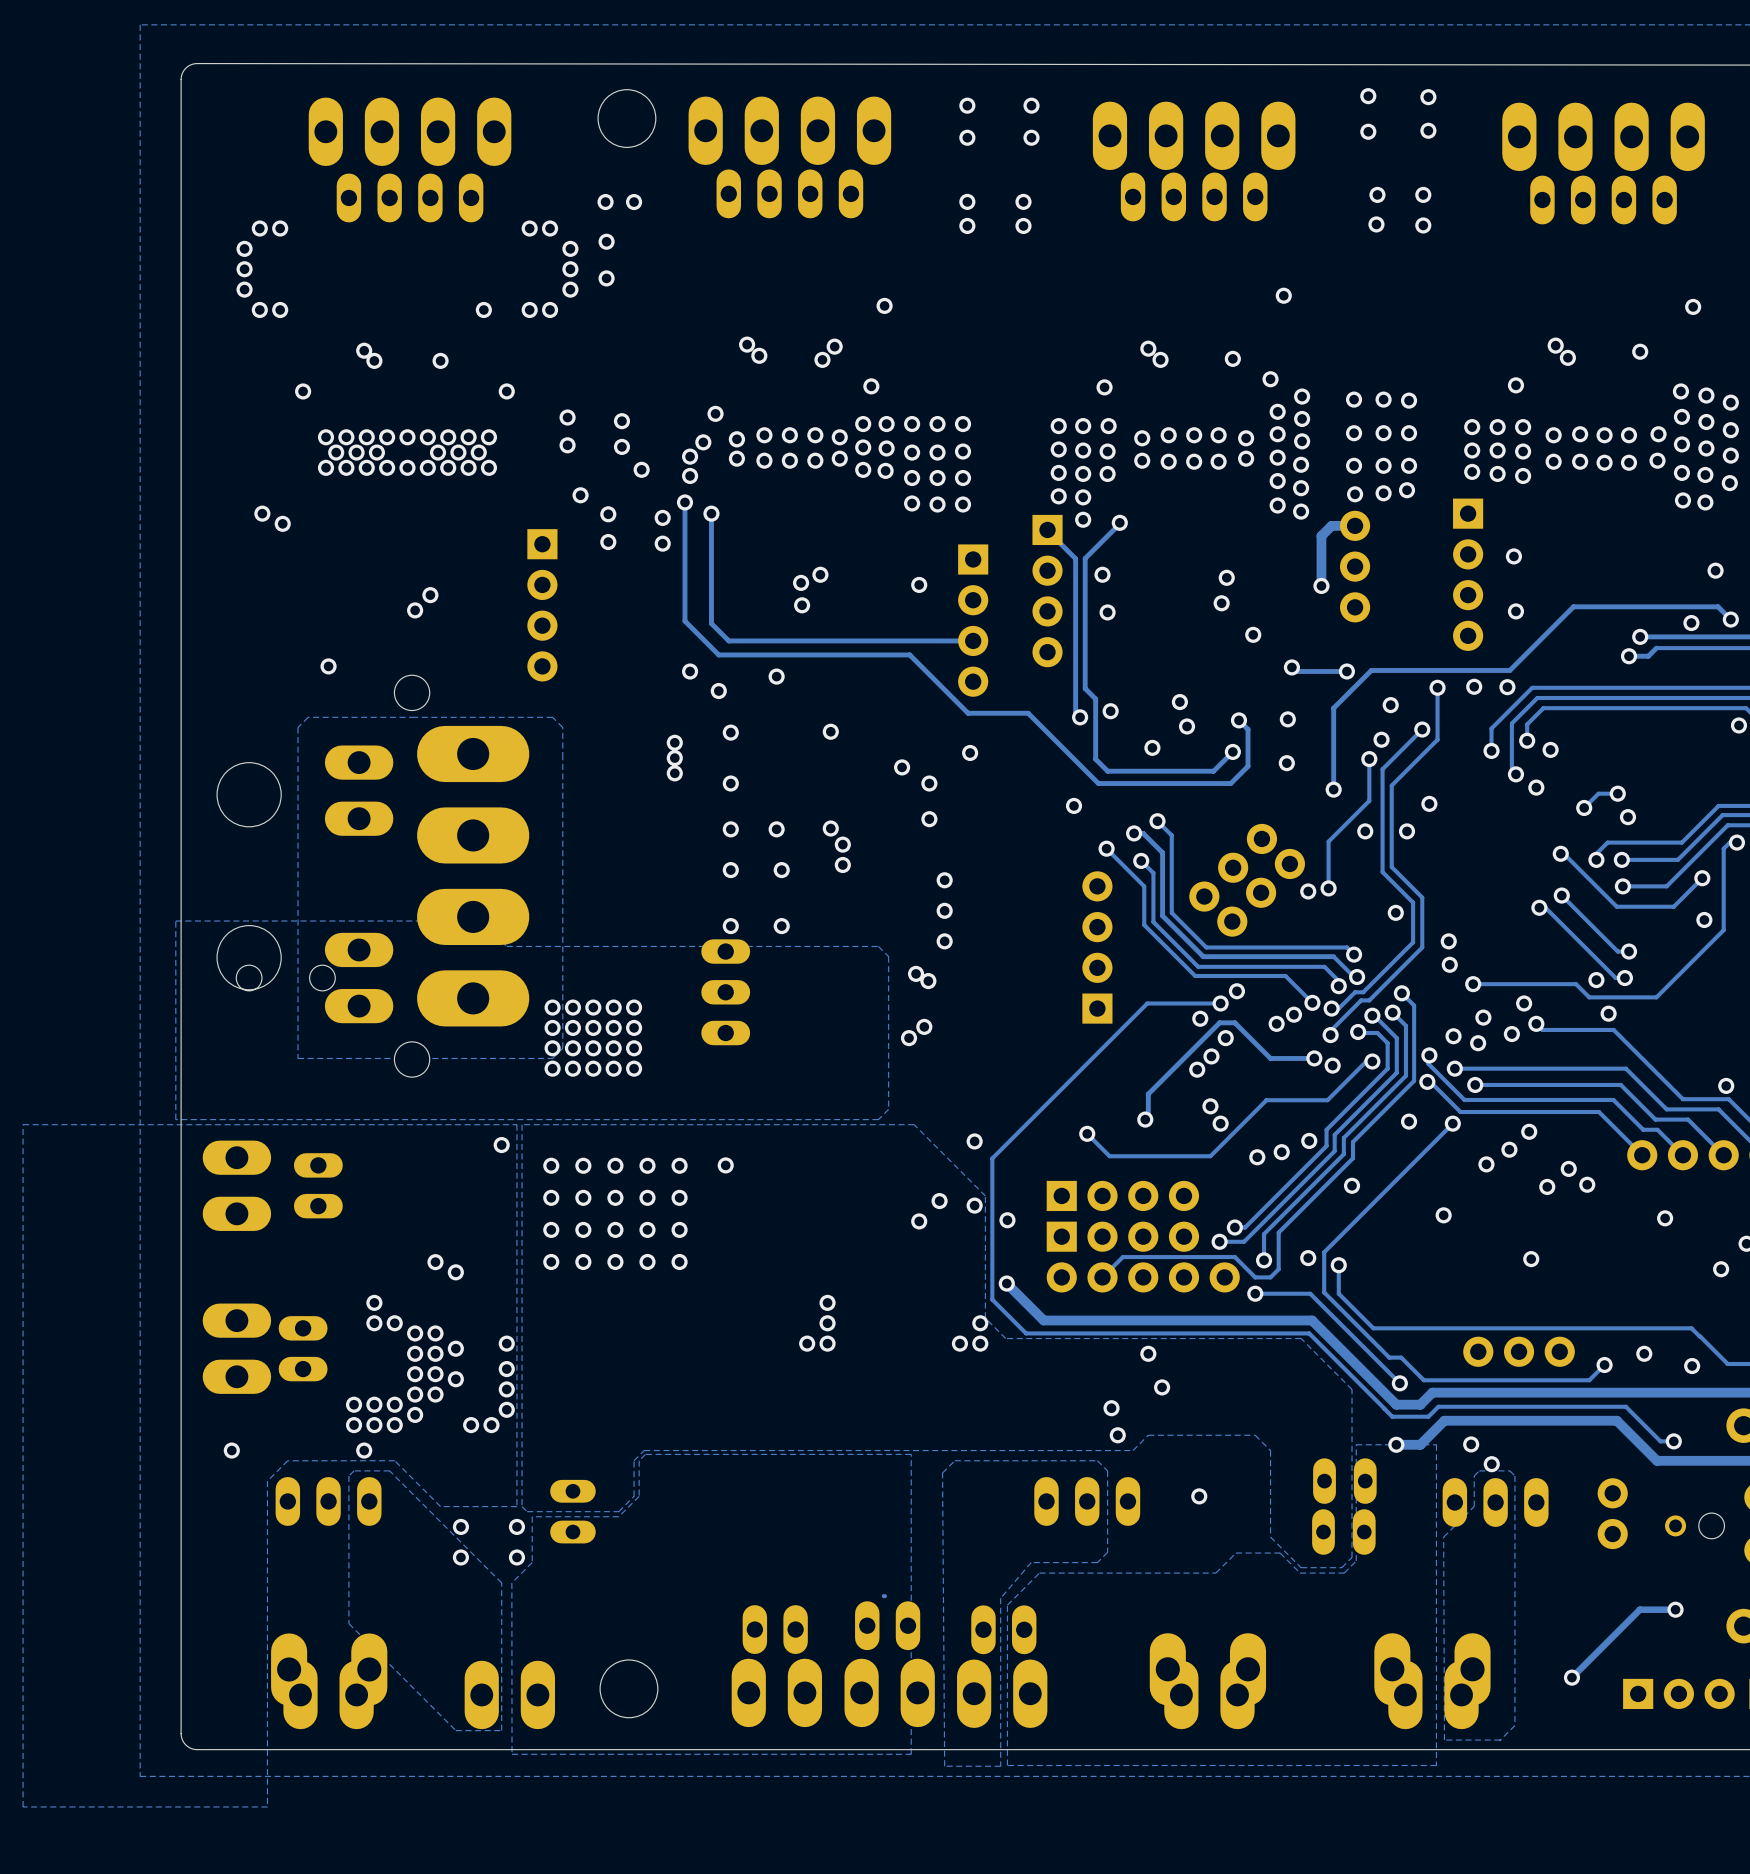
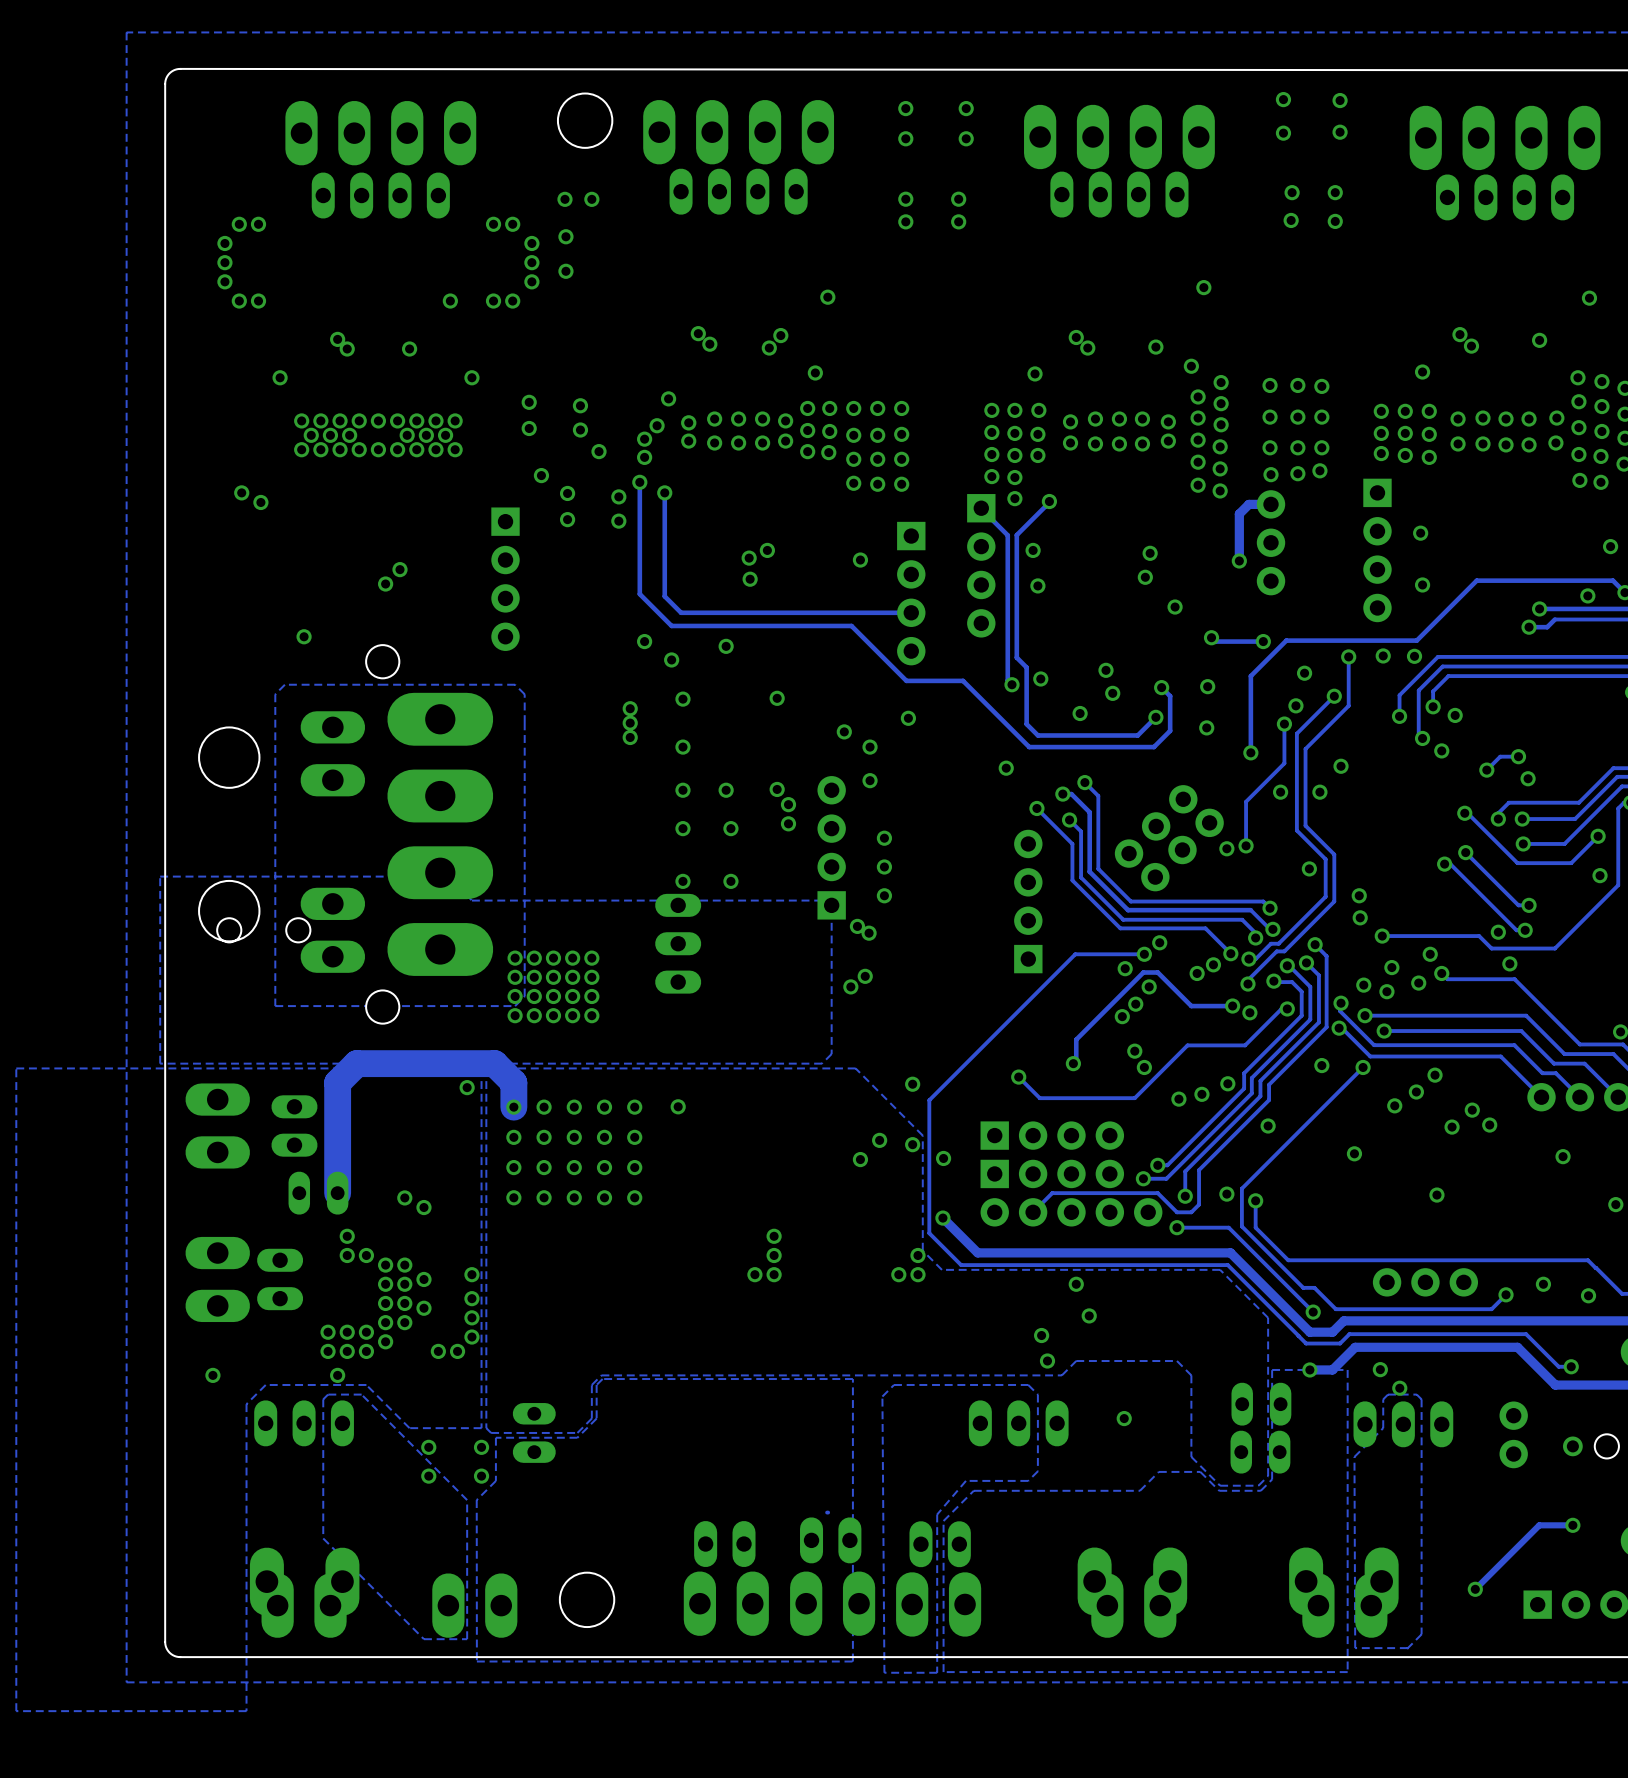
part: none -> (831, 847)
track: none -> (513, 1107) (513, 1082) (494, 1063) (356, 1063) (337, 1082) (337, 1193)
part: none -> (318, 1193)

